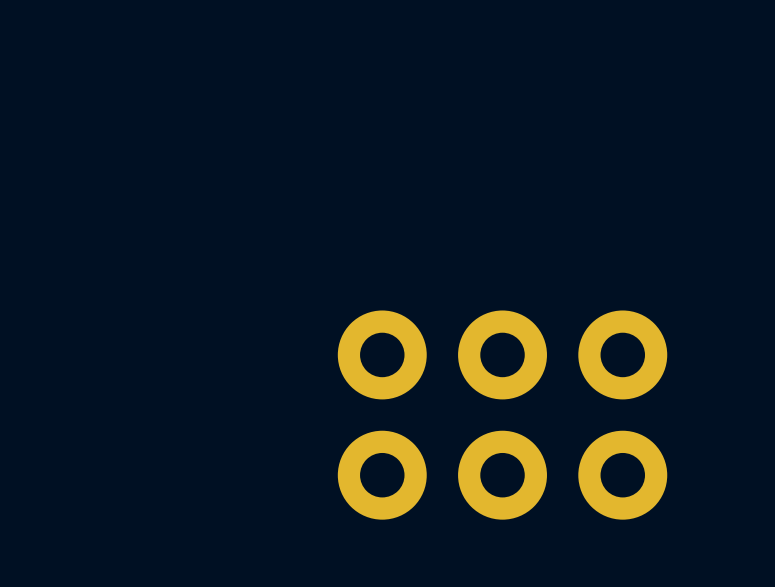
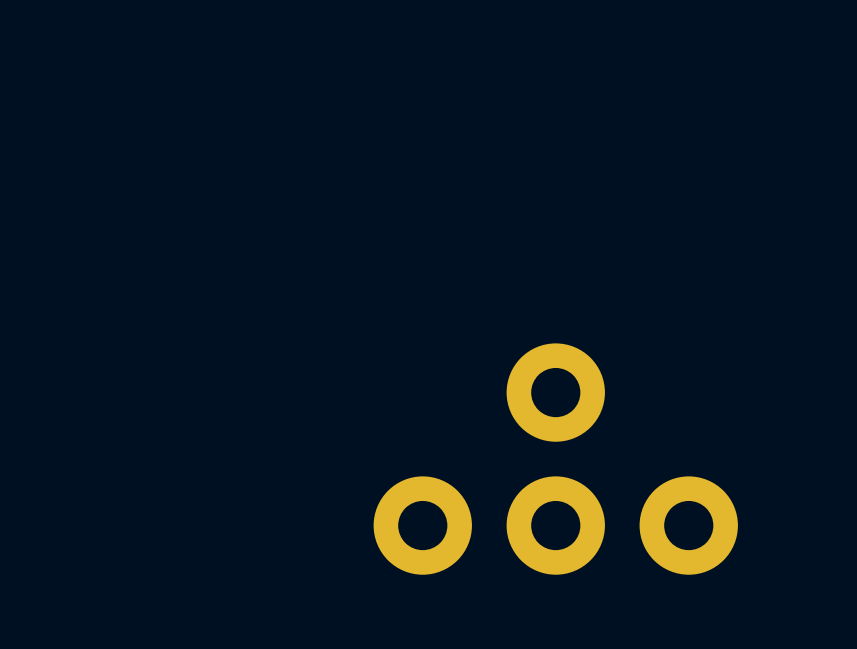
part: (382, 354) -> none
part: (622, 354) -> none

